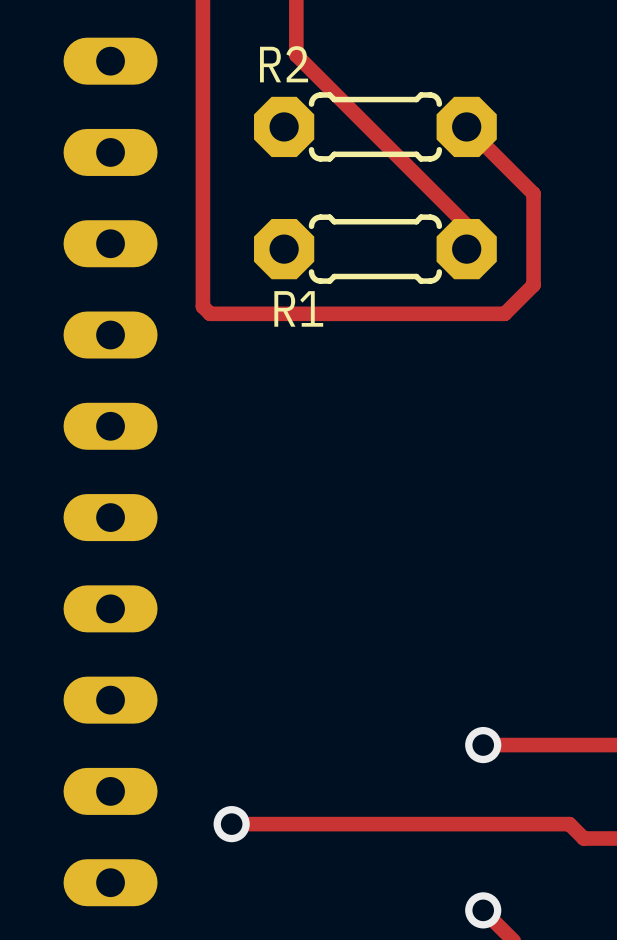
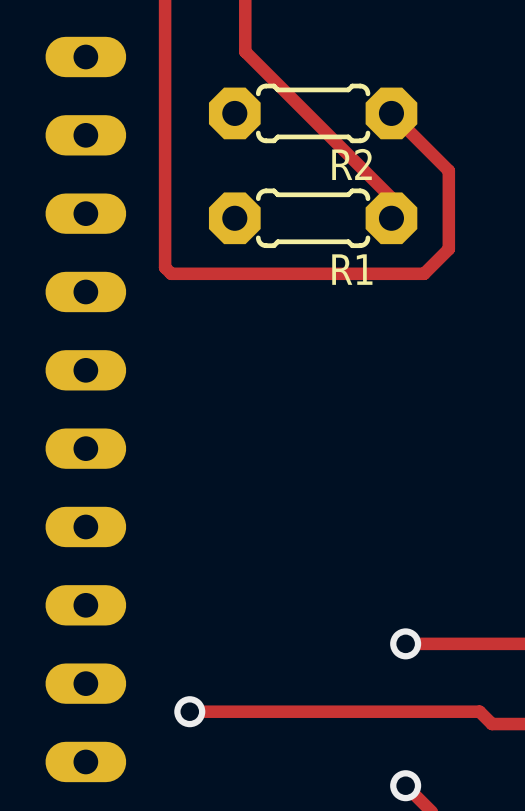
R2 name position: R2 (284, 64) -> R2 (352, 164)
R1 name position: R1 (298, 308) -> R1 (352, 269)

